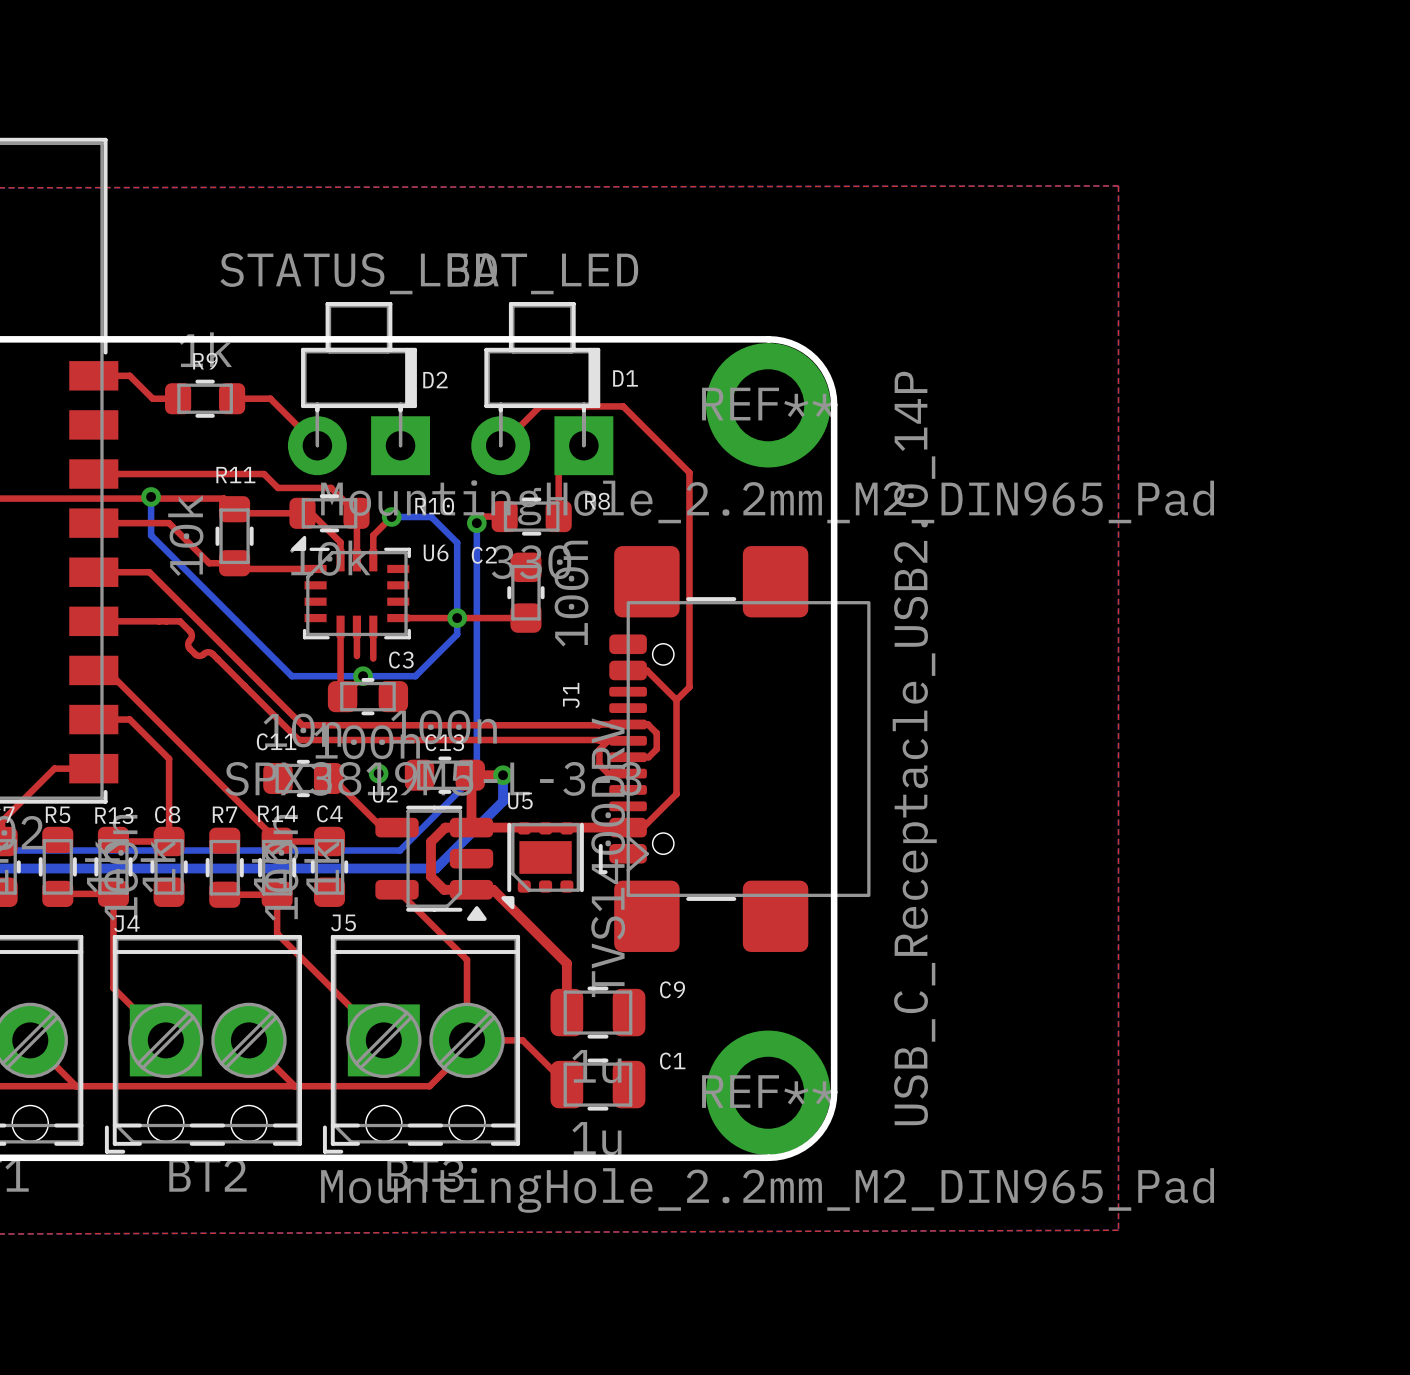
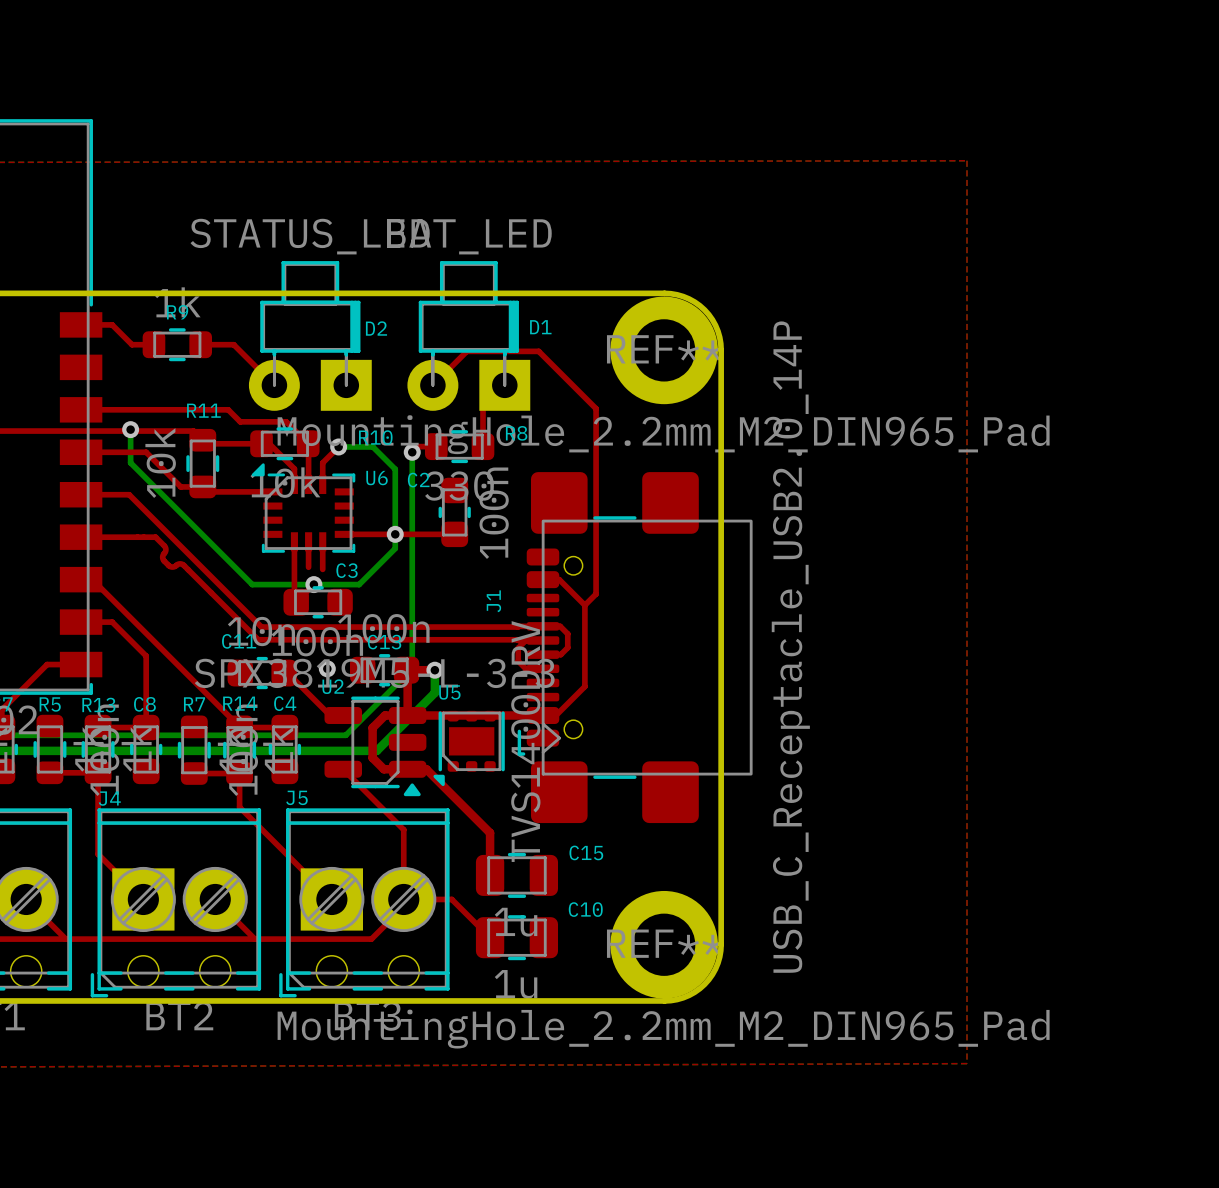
C9 name: C9 (672, 989) -> C15 (586, 852)
C1 name: C1 (672, 1061) -> C10 (585, 909)

